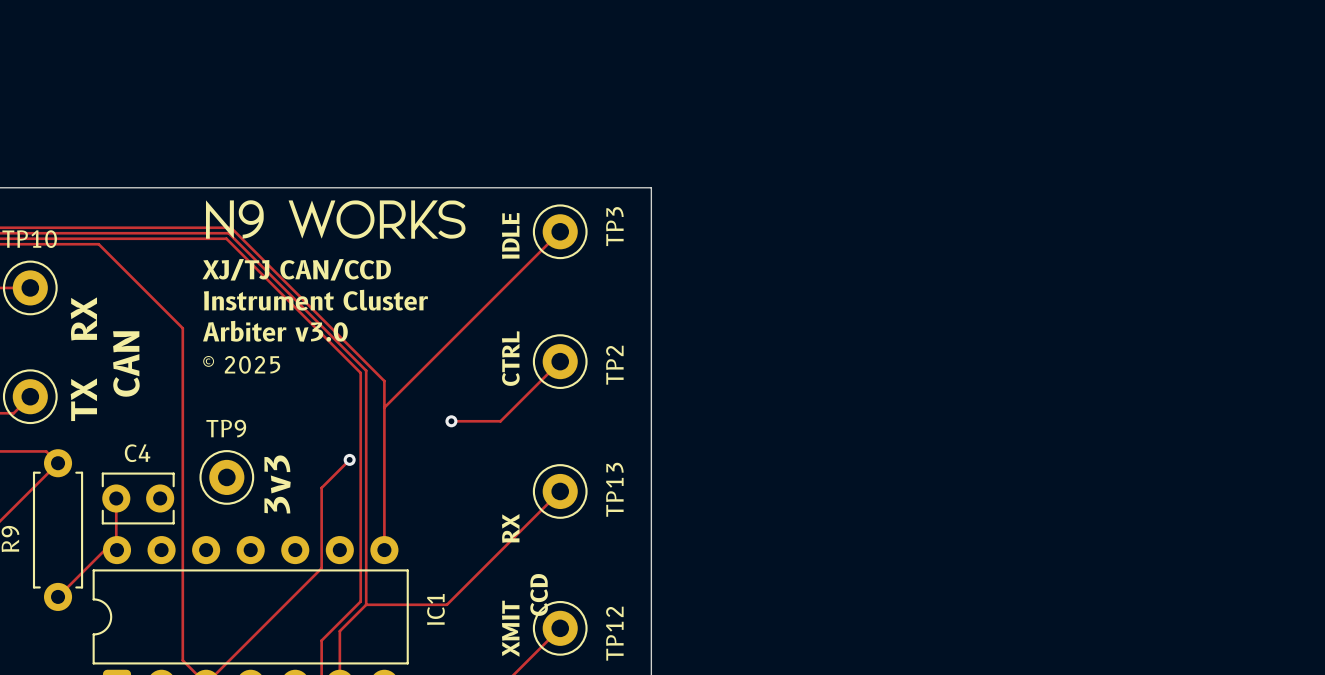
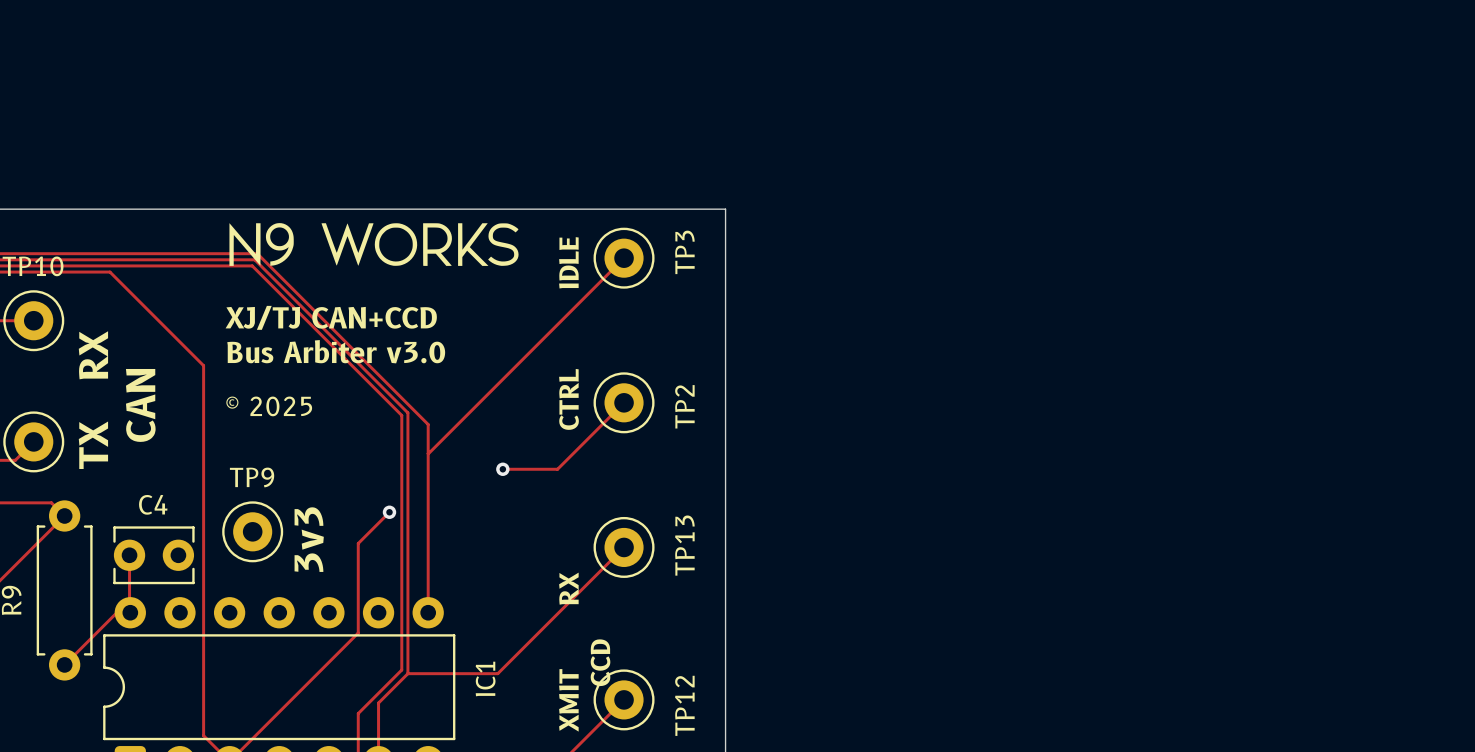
text: XJ/TJ CAN/CCD (296, 269) -> XJ/TJ CAN+CCD (331, 317)
text: Instrument Cluster (315, 300) -> none
text: Arbiter v3.0 (275, 331) -> Bus Arbiter v3.0 (336, 351)

